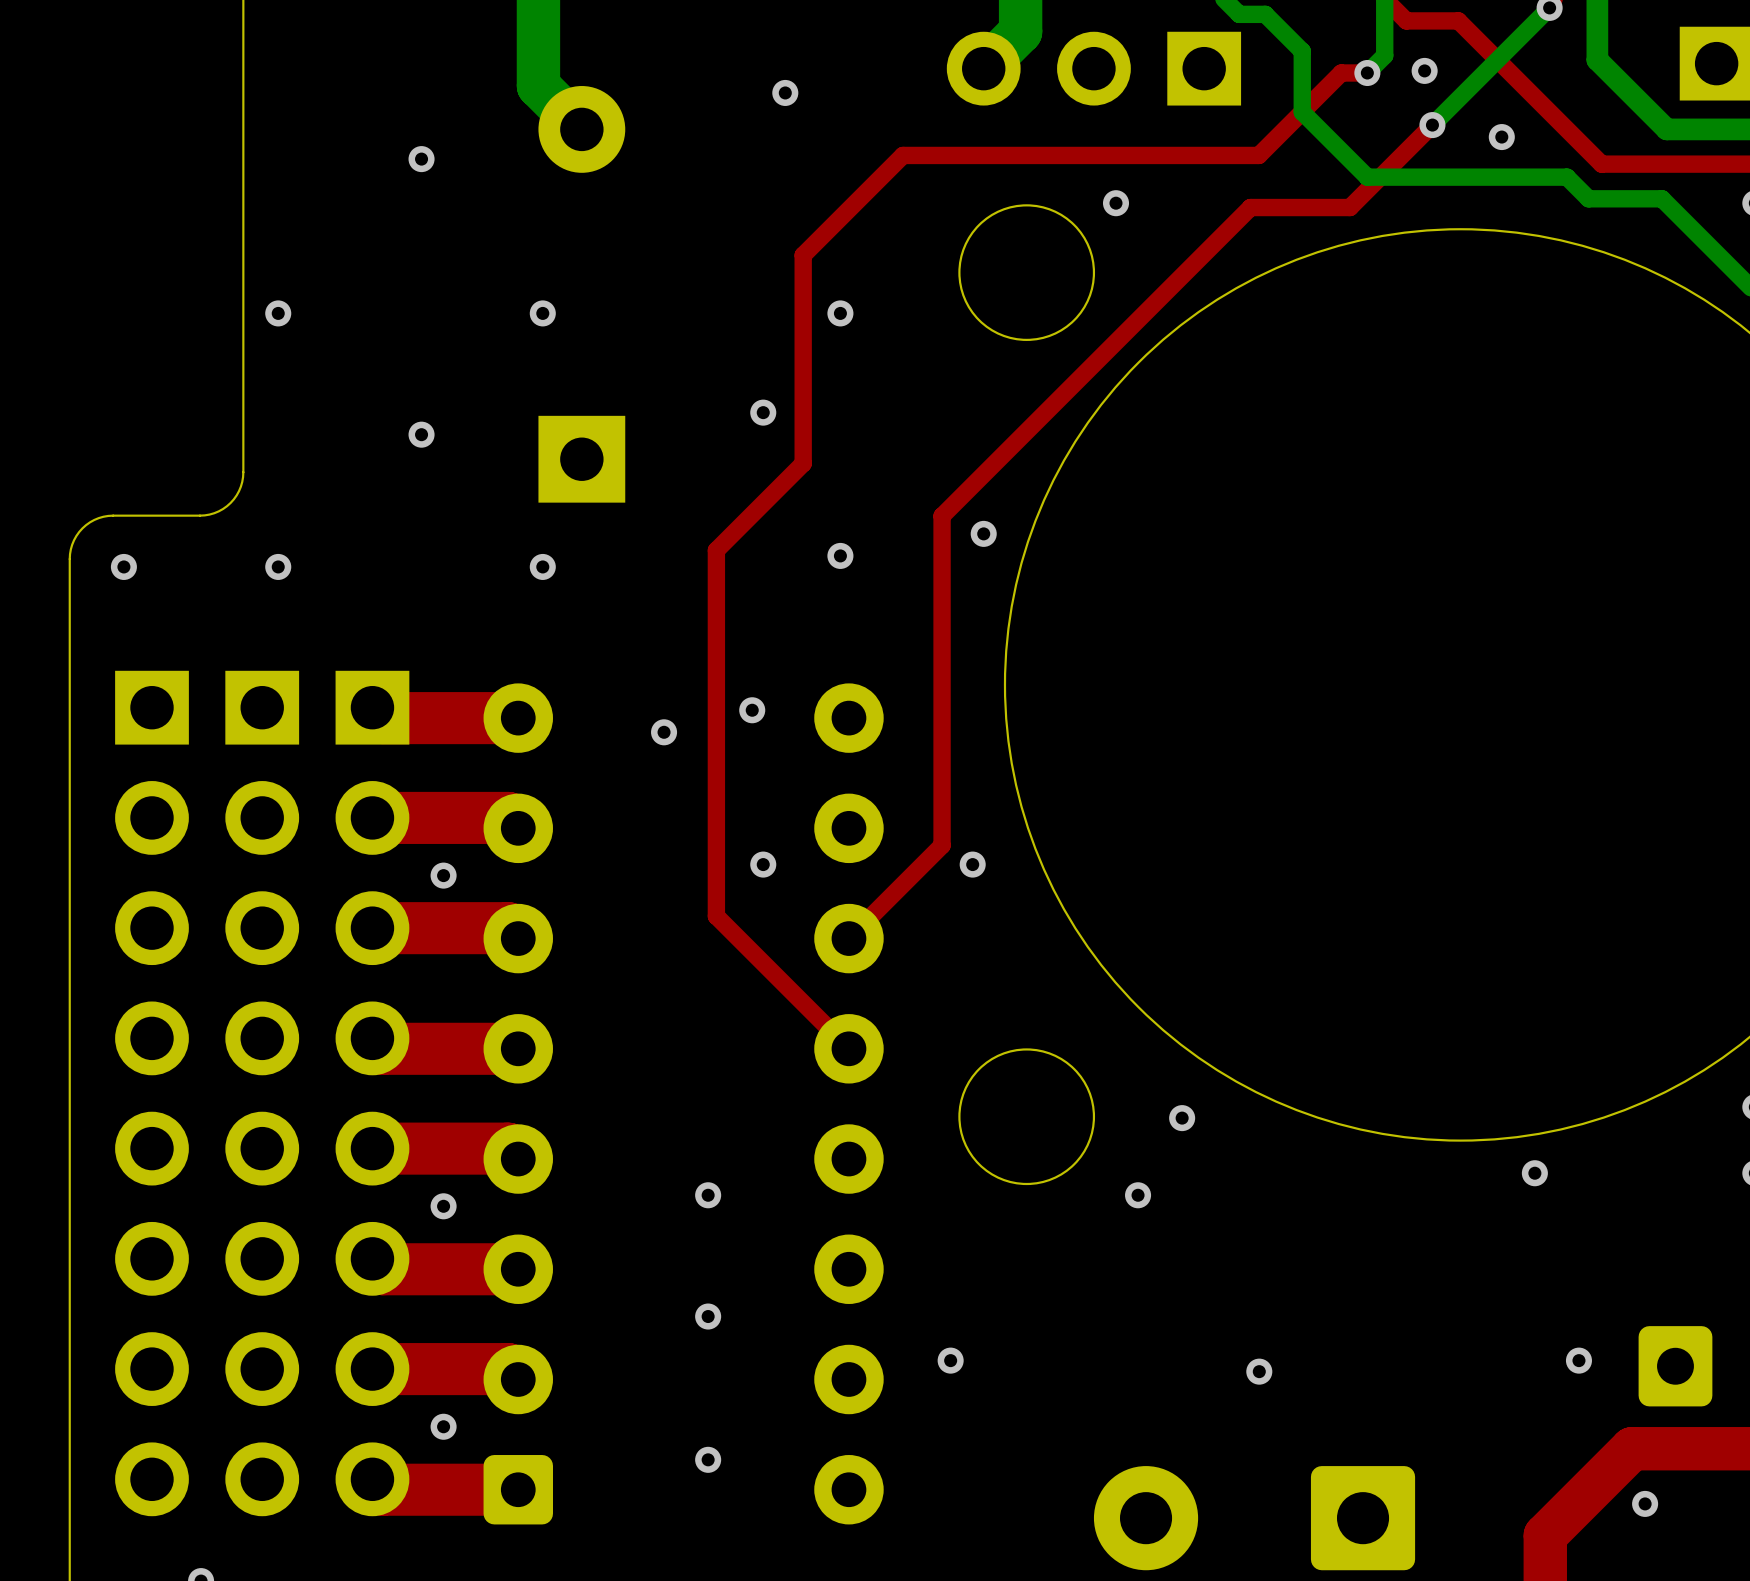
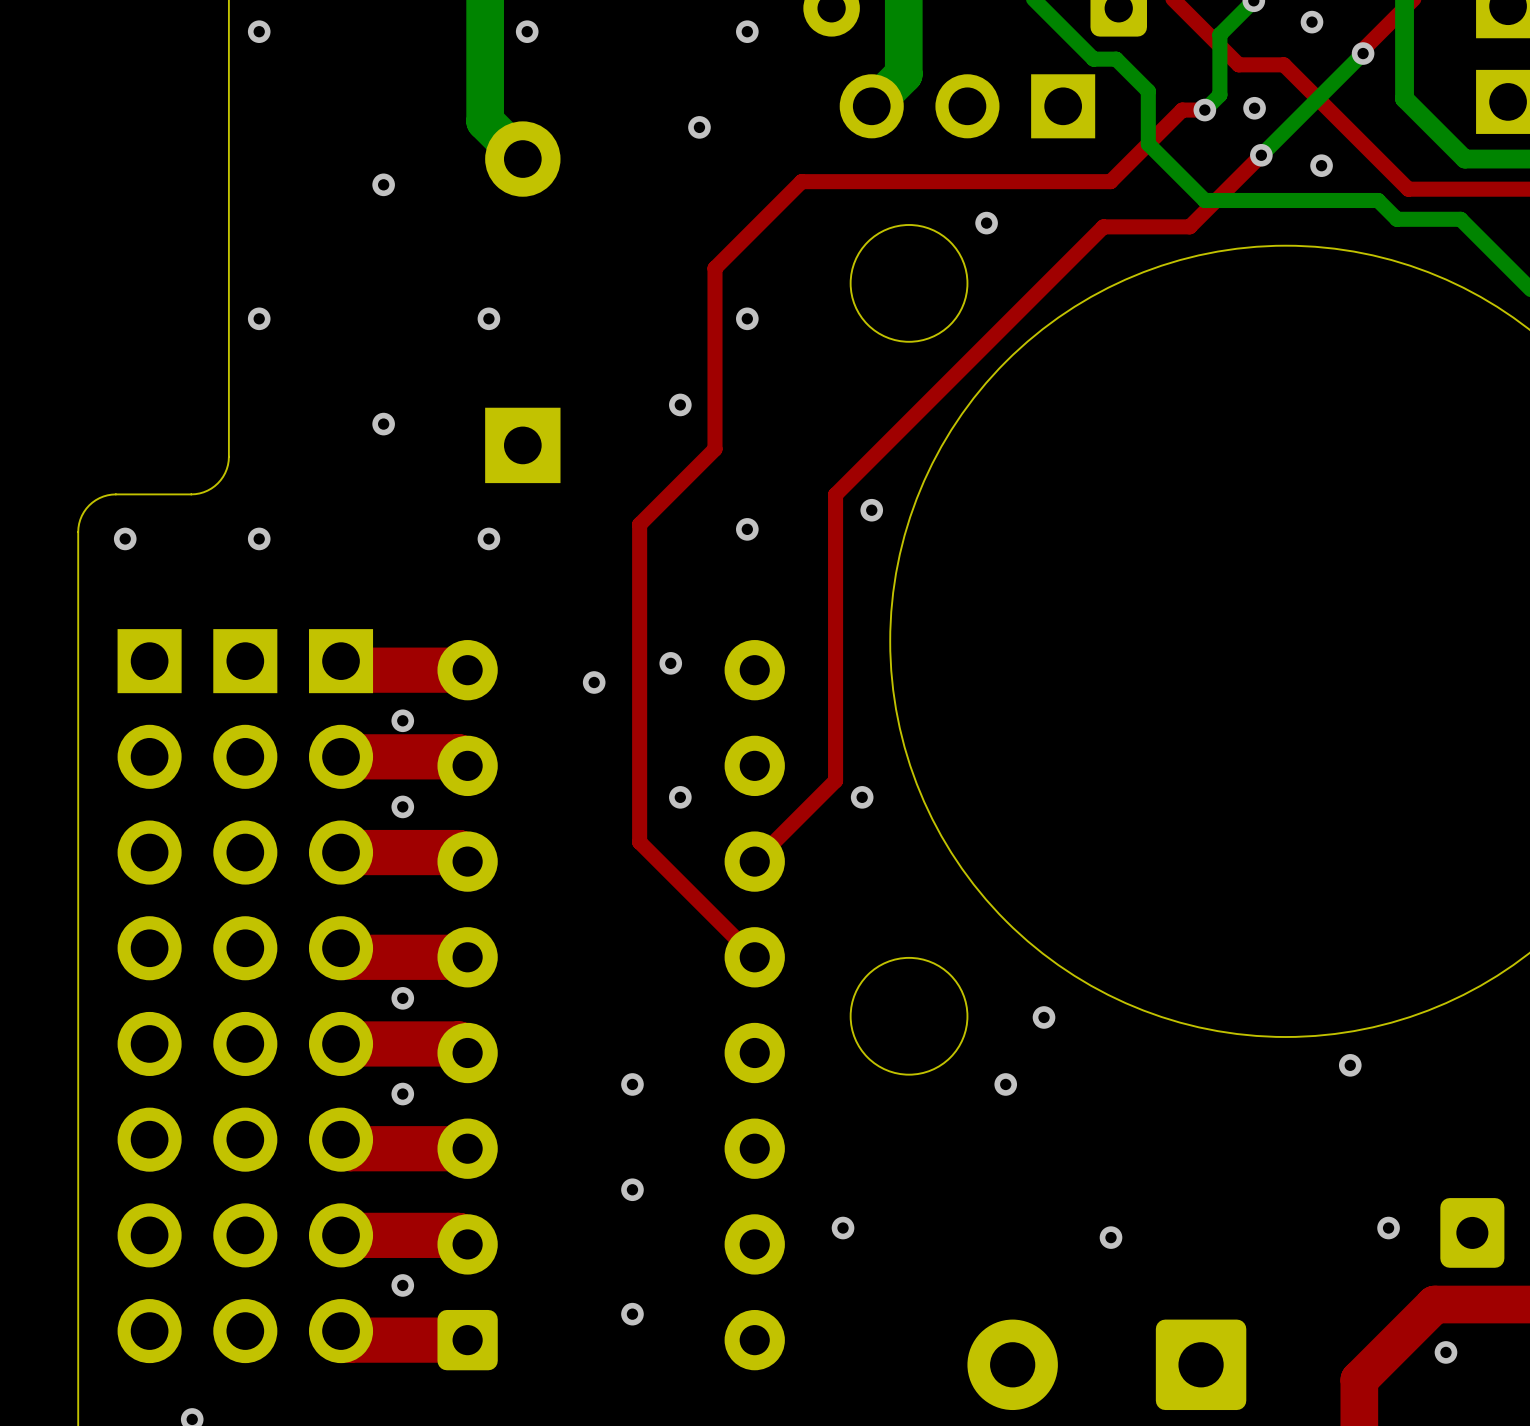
via: none -> (402, 720)
via: none -> (402, 998)

